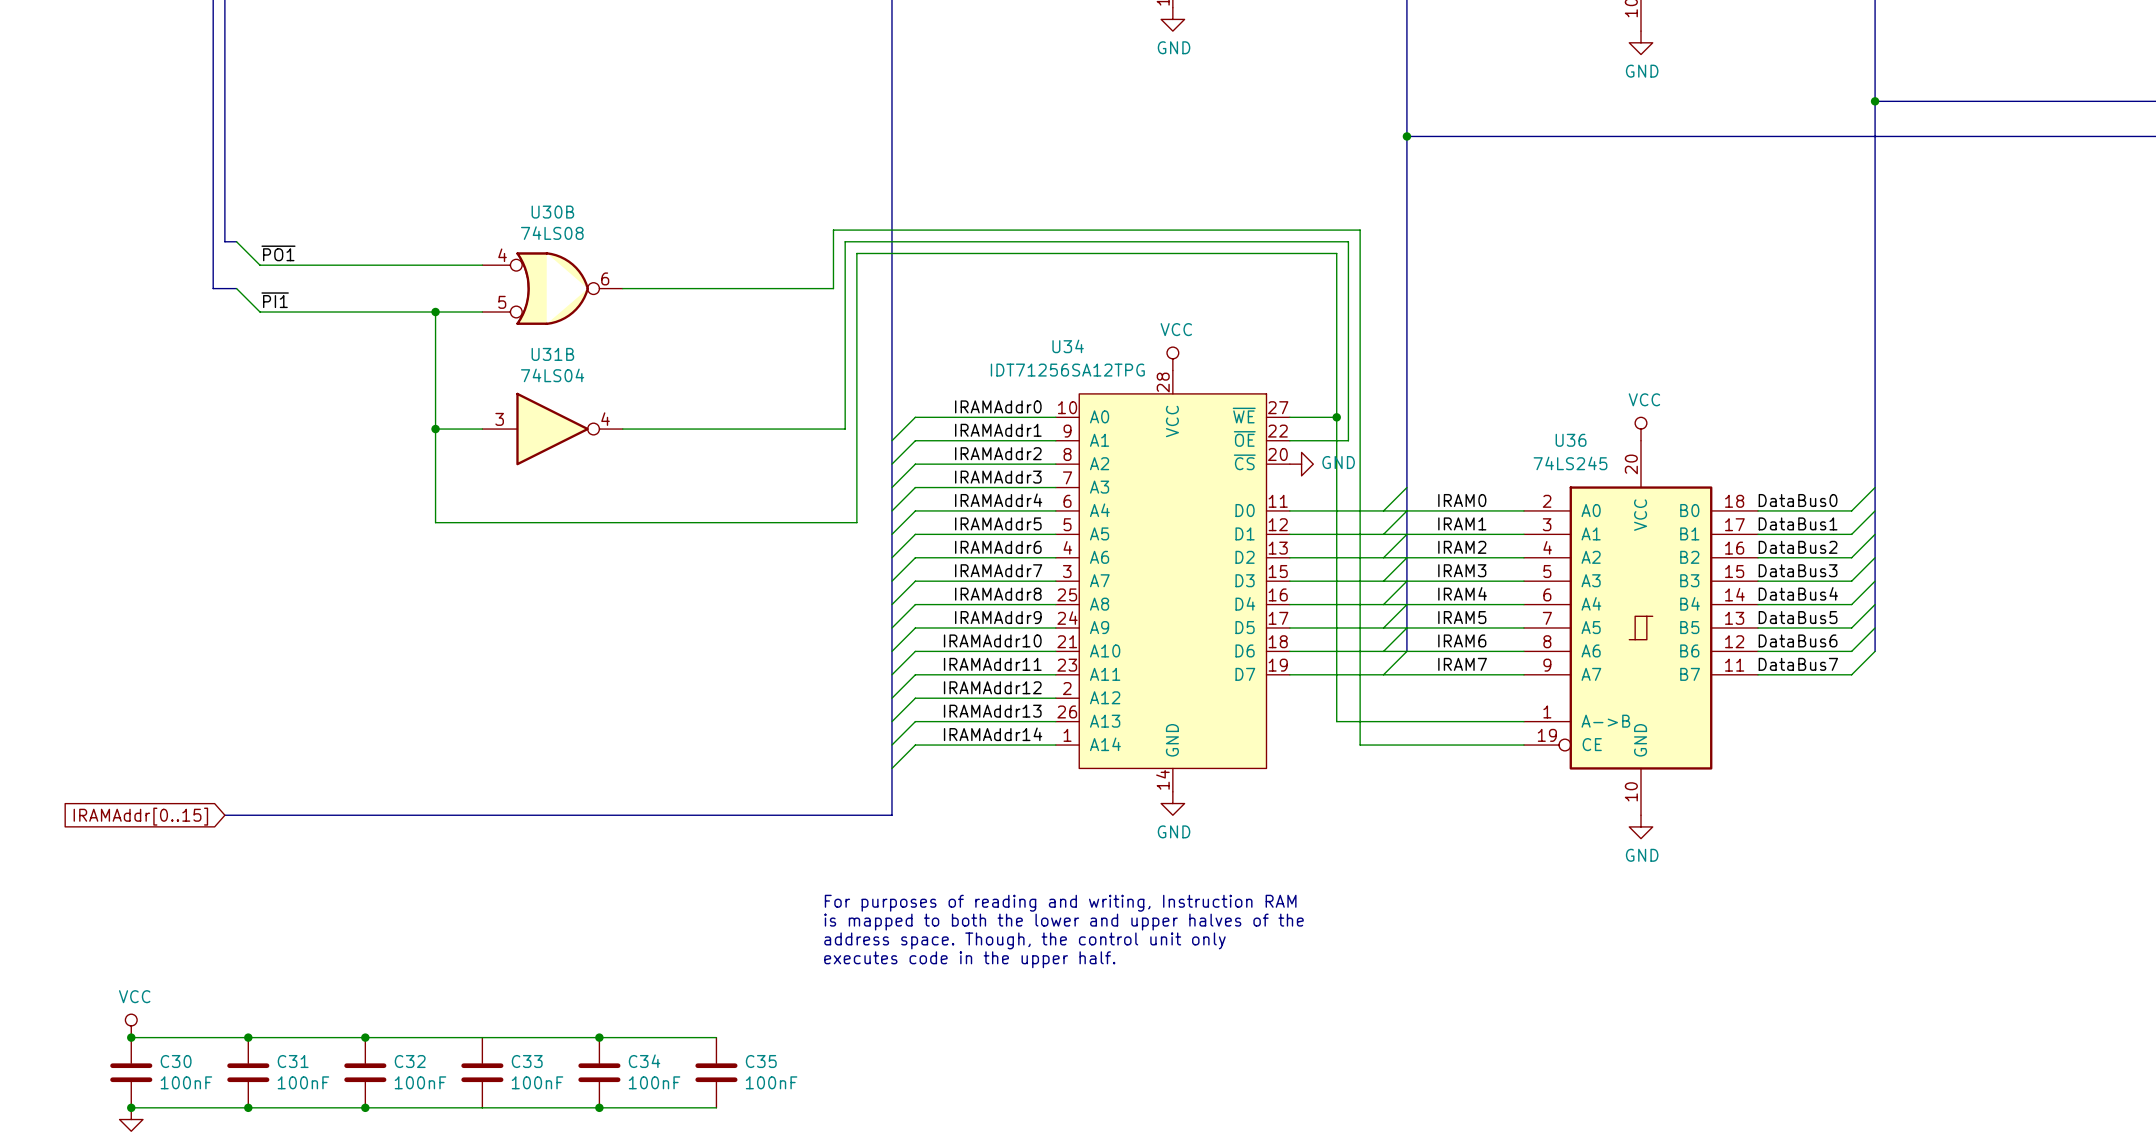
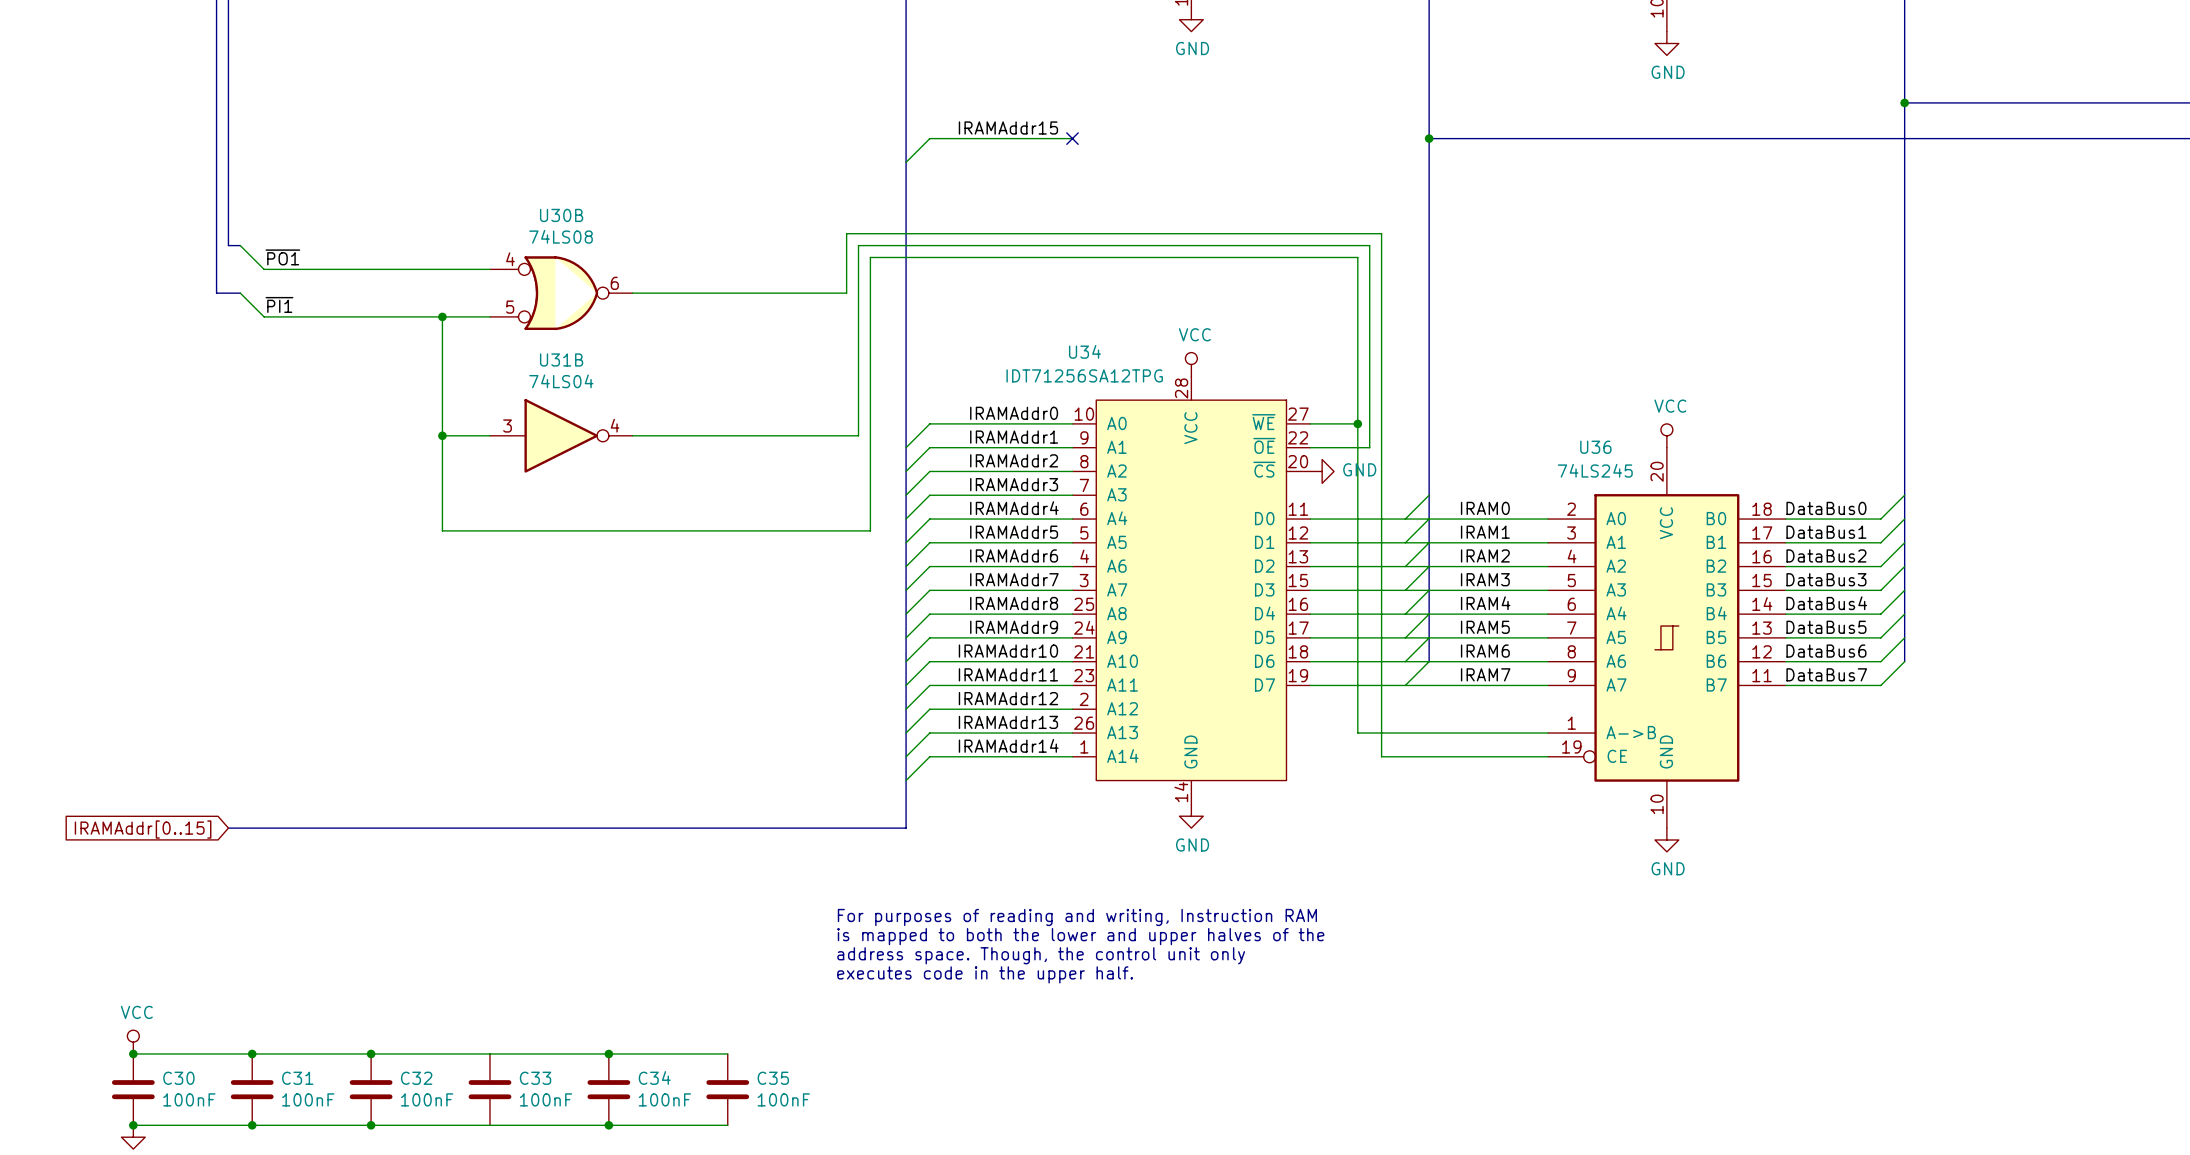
label: none -> IRAMAddr15 (1008, 127)
wire: none -> (1072, 138) (929, 138) (906, 162)
no-connect mark: none -> (1072, 138)

